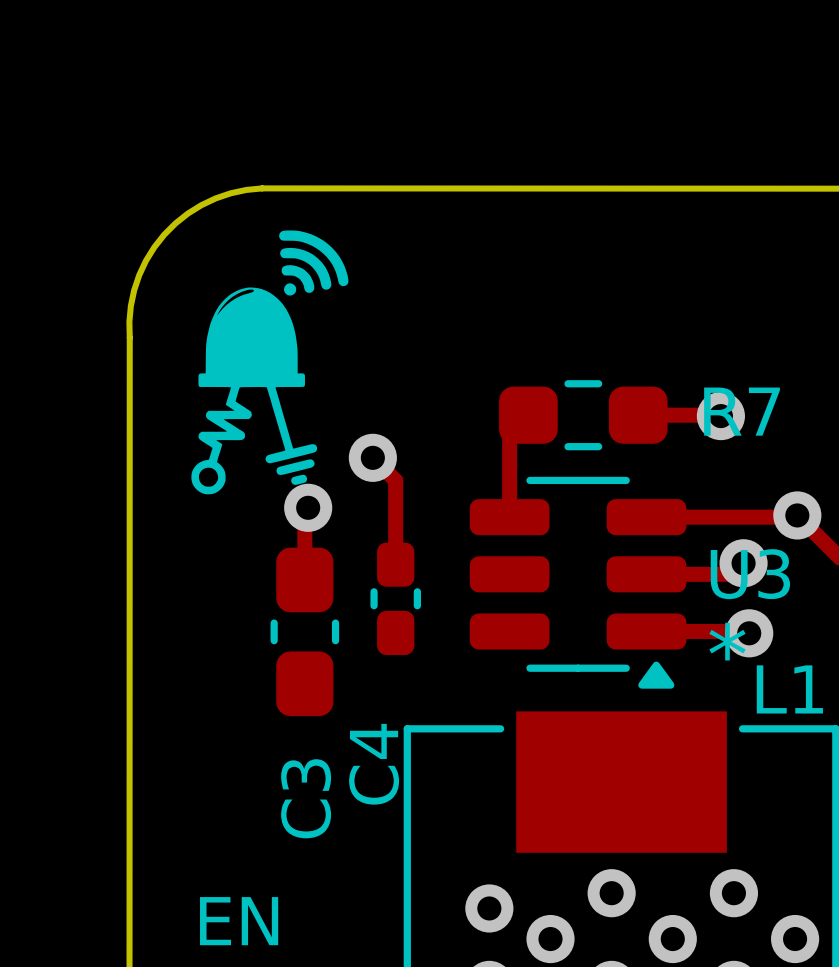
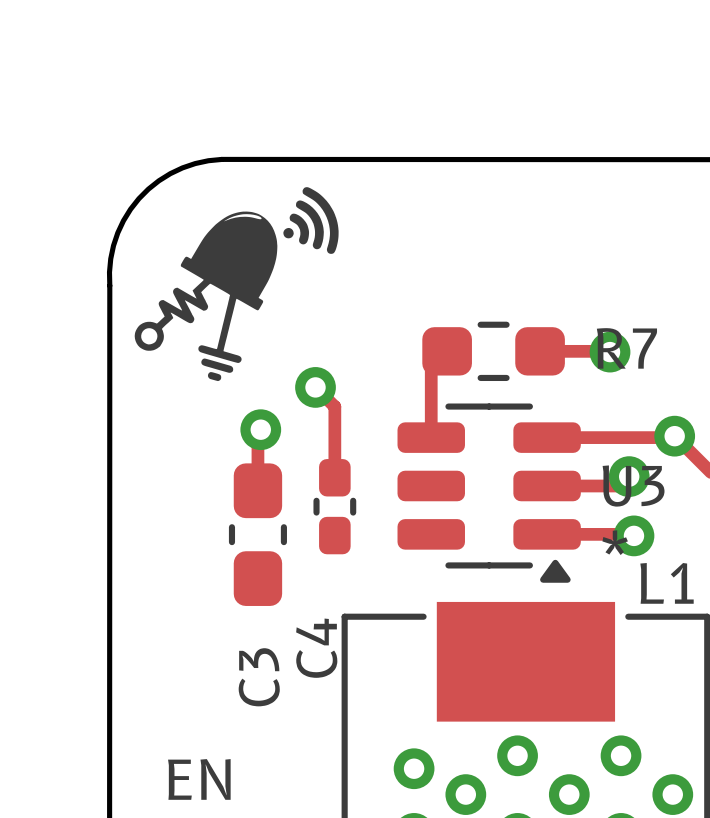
drawing shape: [191, 230, 349, 495] -> [134, 187, 339, 382]

